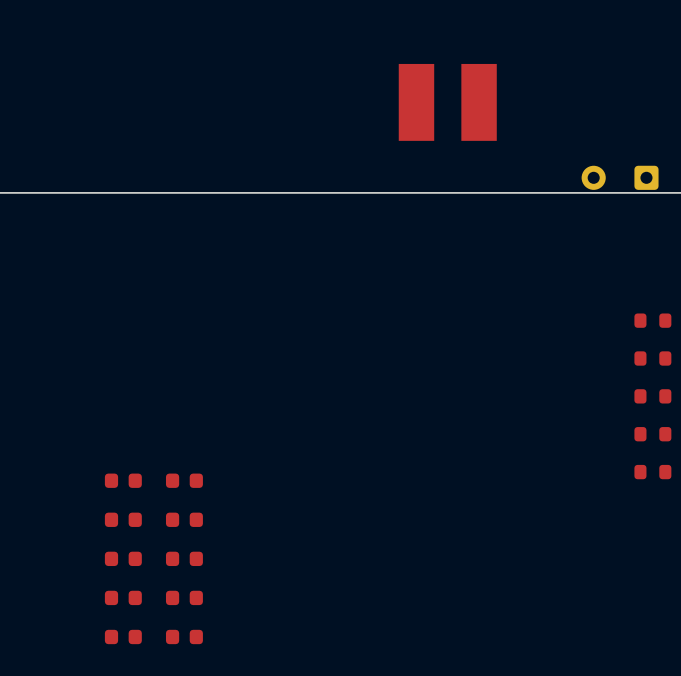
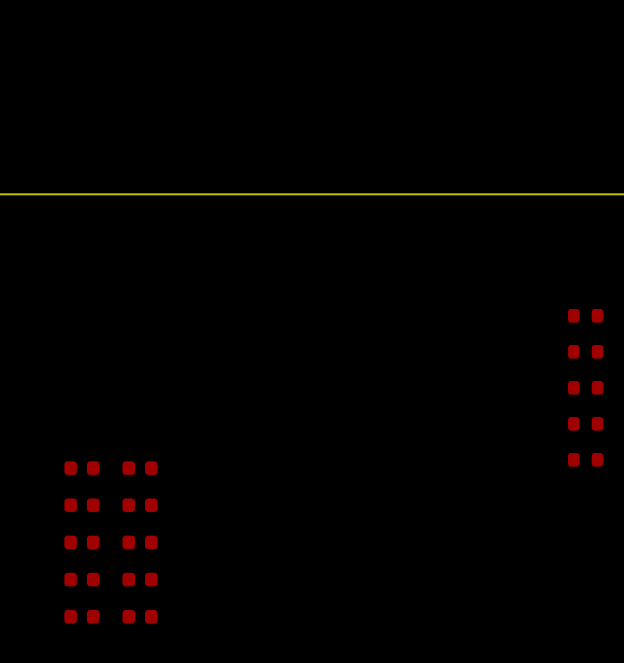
part: (447, 102) -> none
part: (620, 177) -> none

